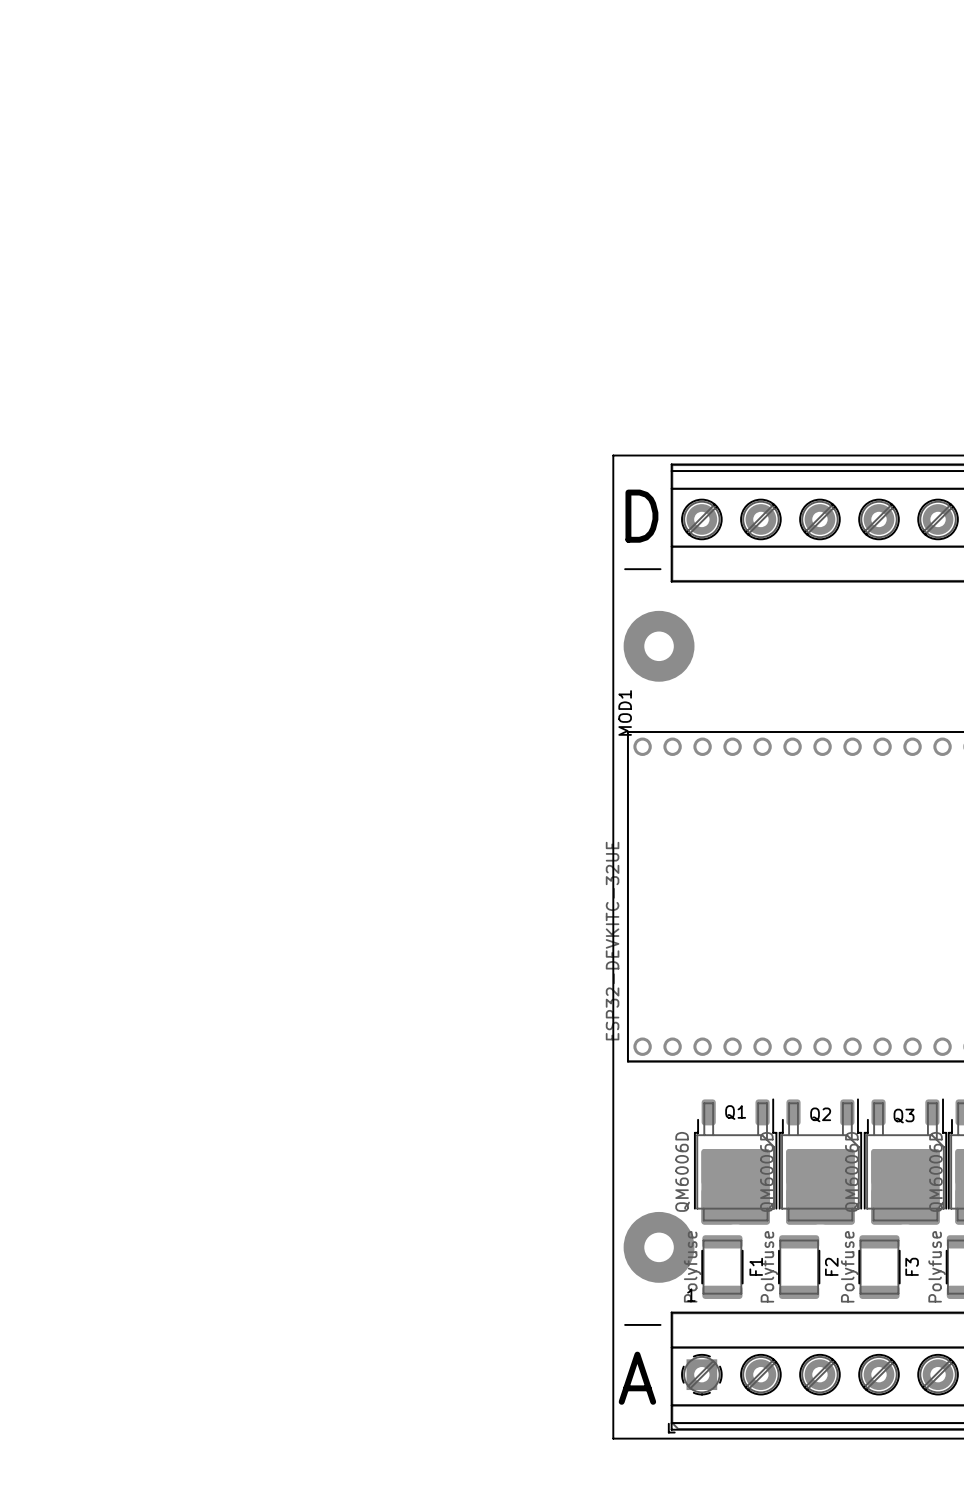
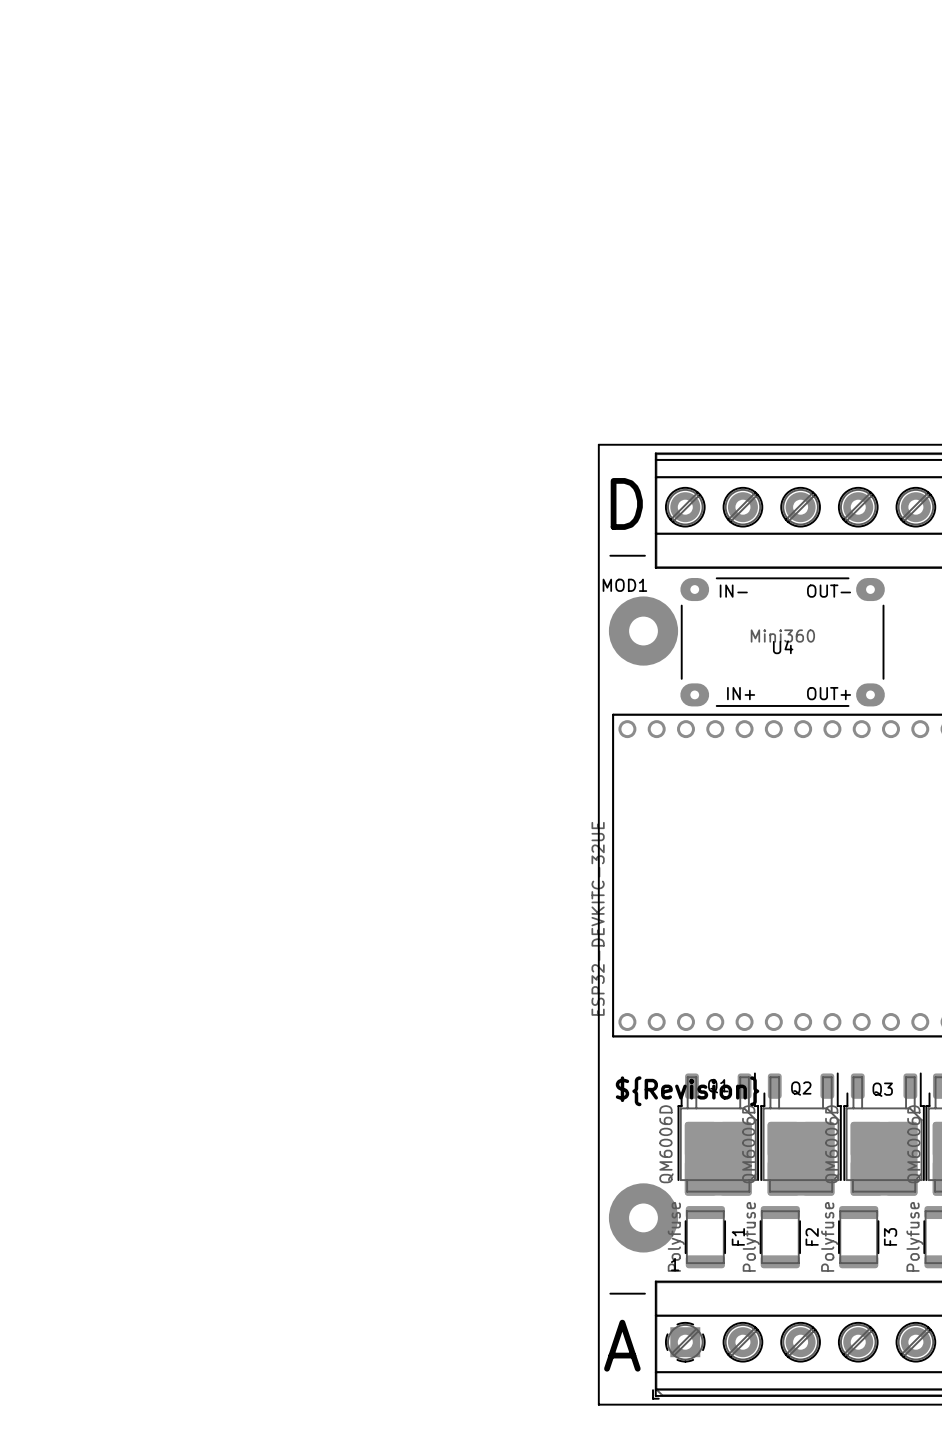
U4: none -> Mini360 (782, 642)
MOD1 name rotation: 0° (625, 712) -> 90° clockwise (624, 585)
MOD1 name position: MOD1 (625, 712) -> MOD1 (624, 585)
text: none -> ${Revision} (687, 1091)

